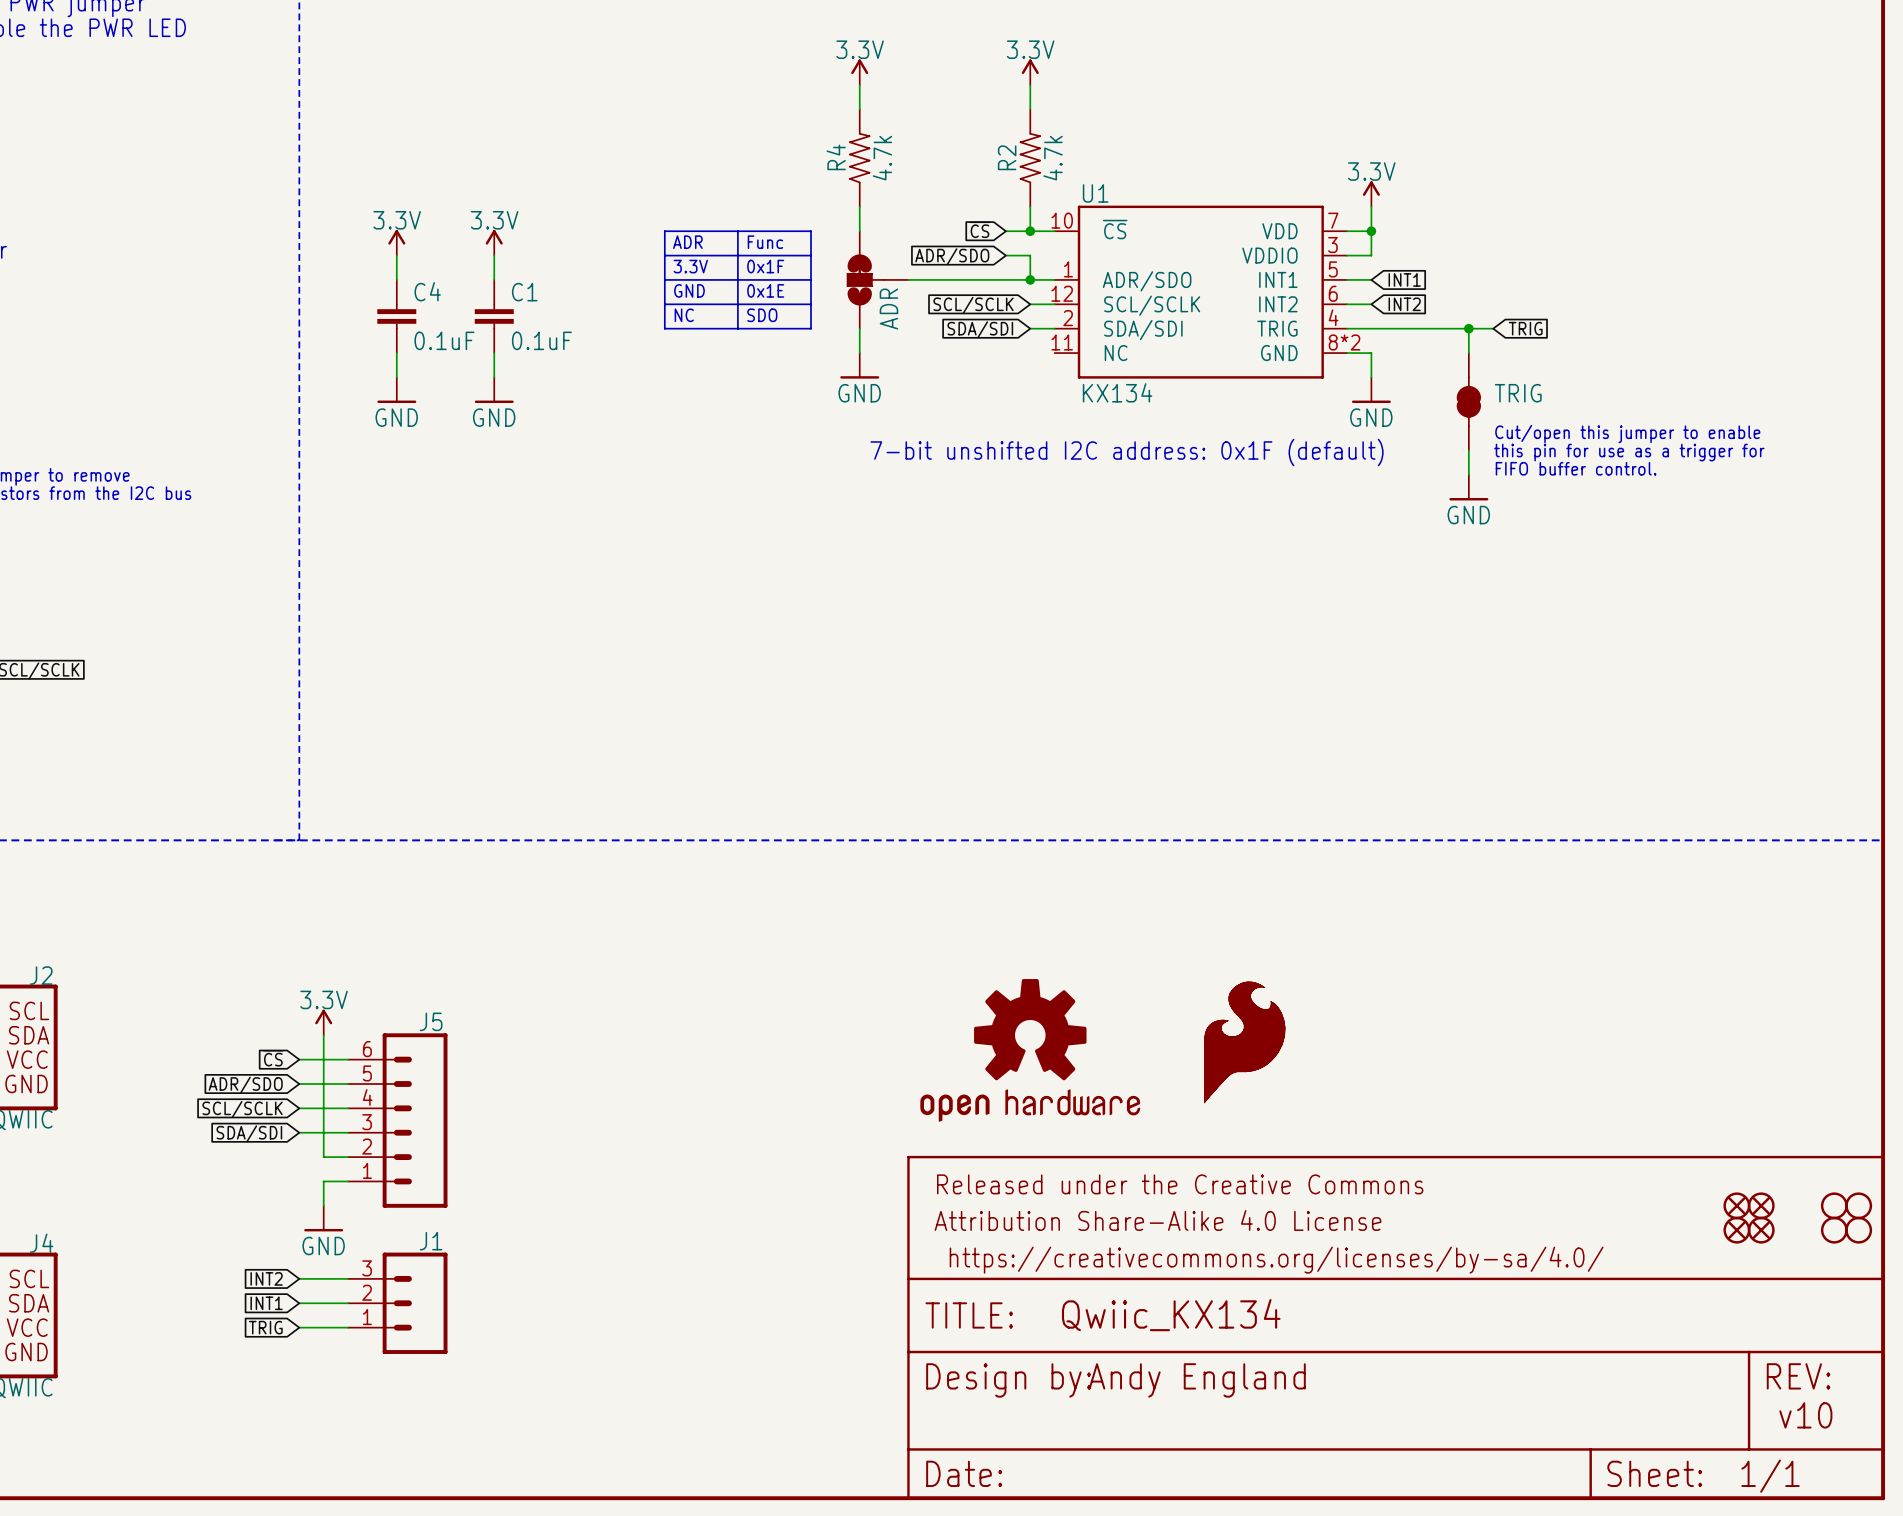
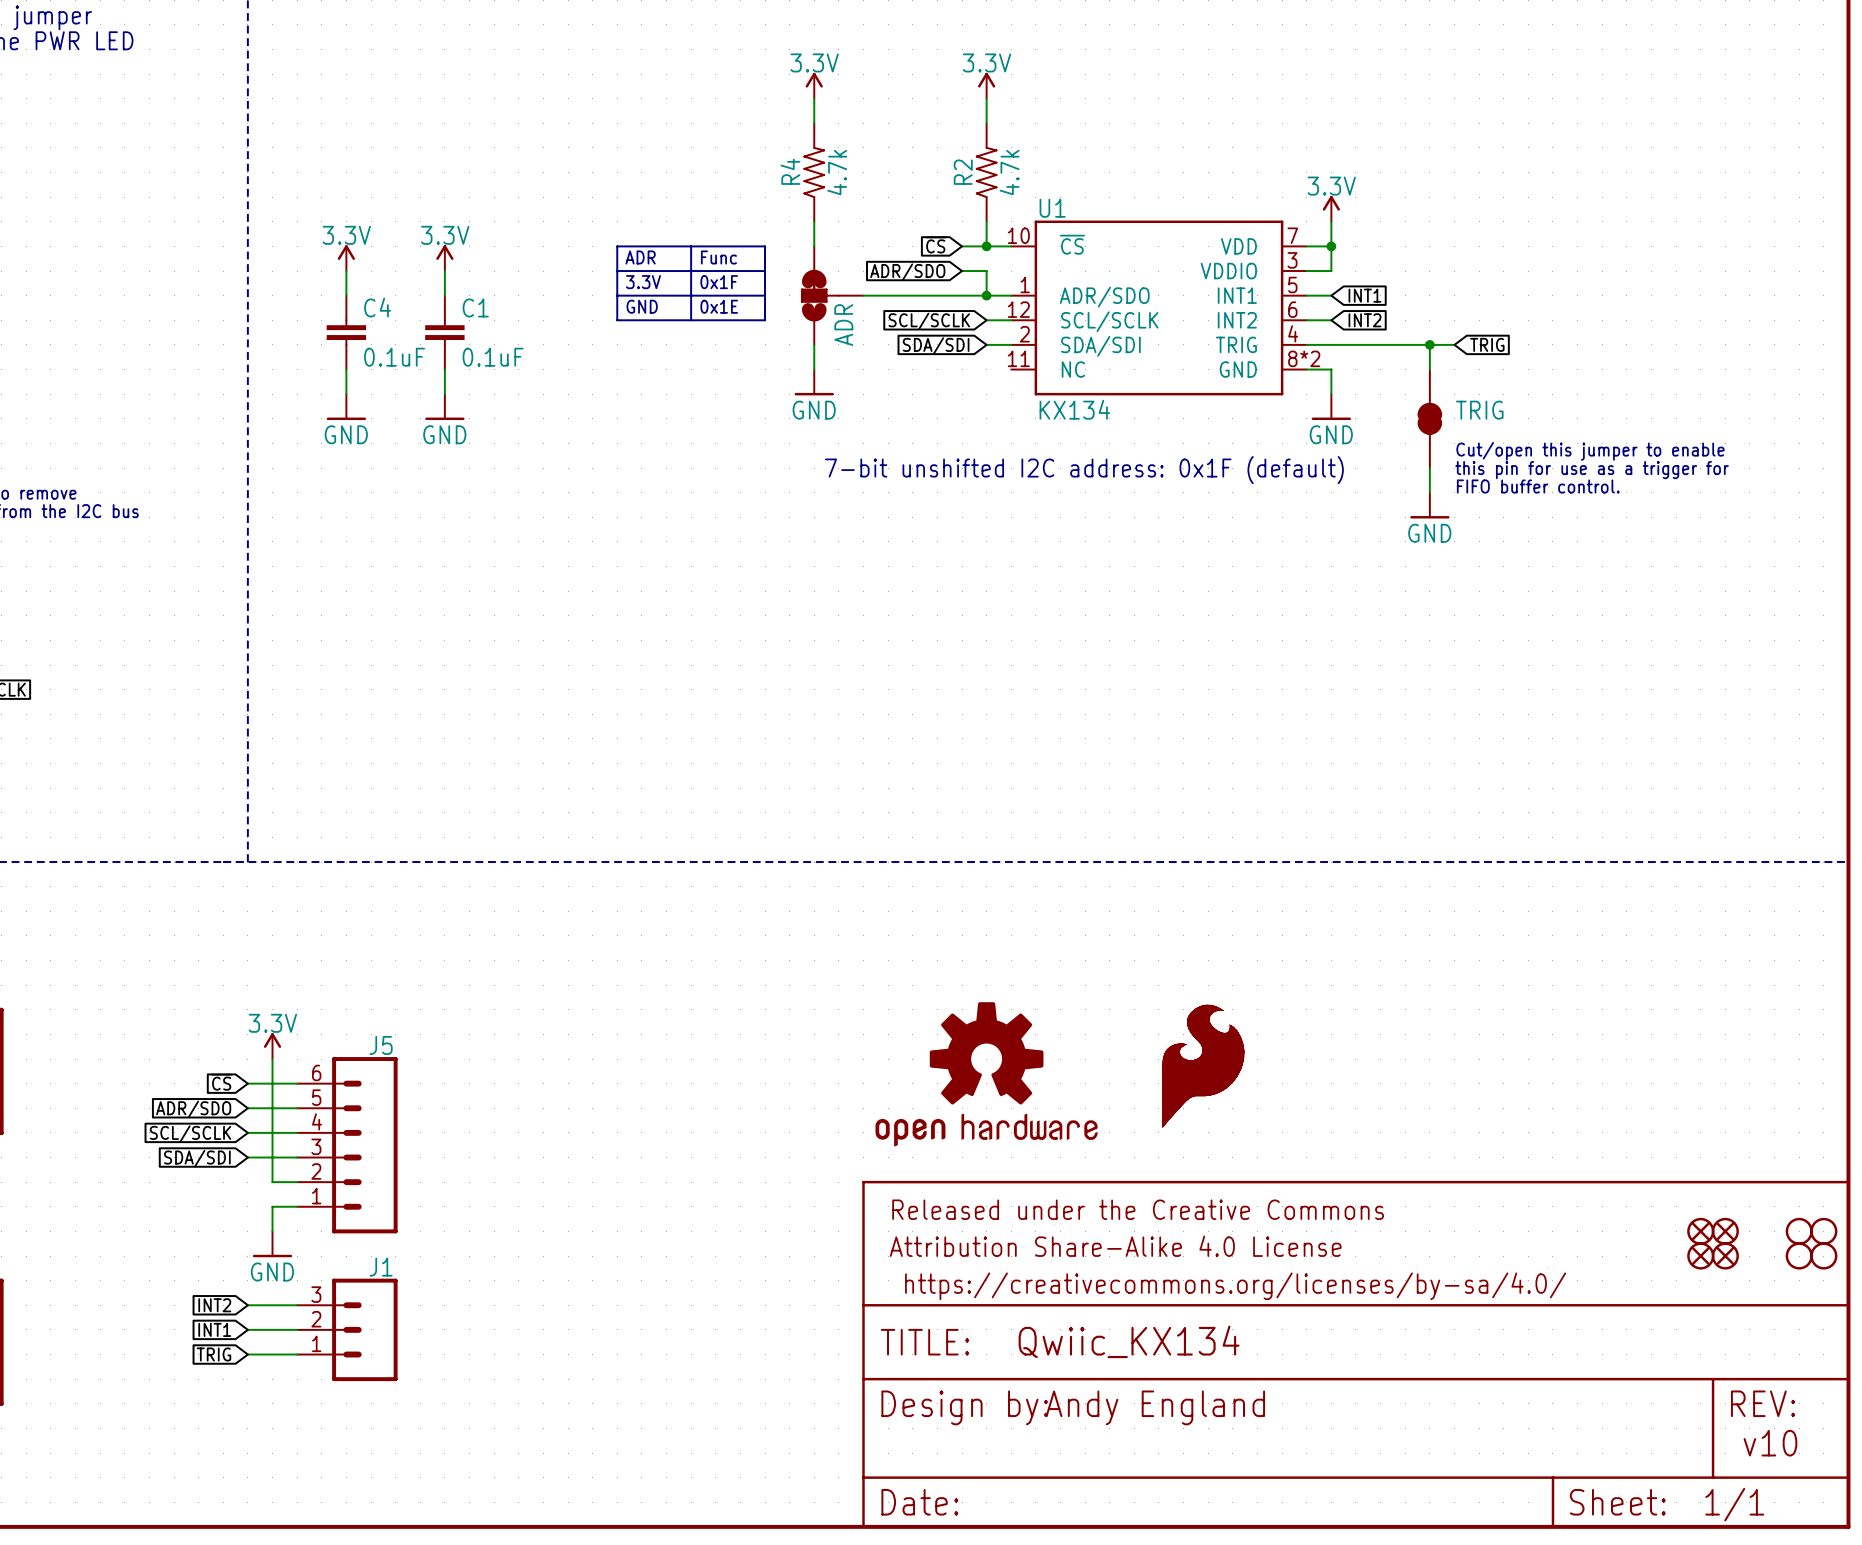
line: (664, 304) (664, 328) (811, 328) (811, 304) -> none
line: (737, 304) (737, 328) -> none
text: NC (684, 315) -> none
text: SDO (762, 315) -> none

